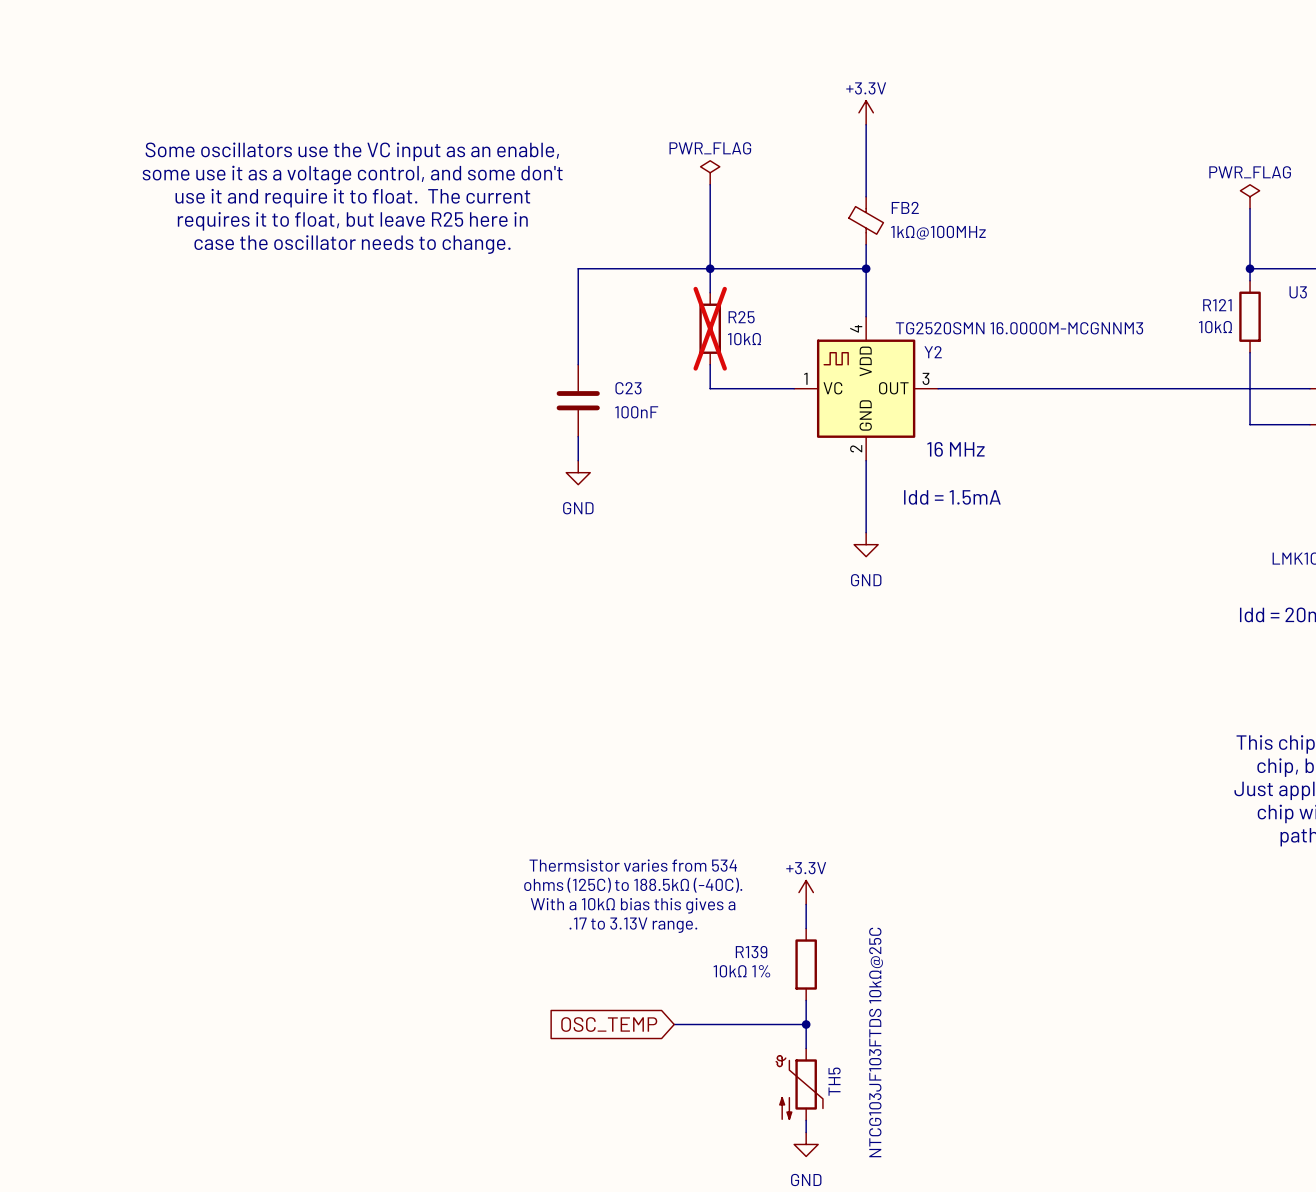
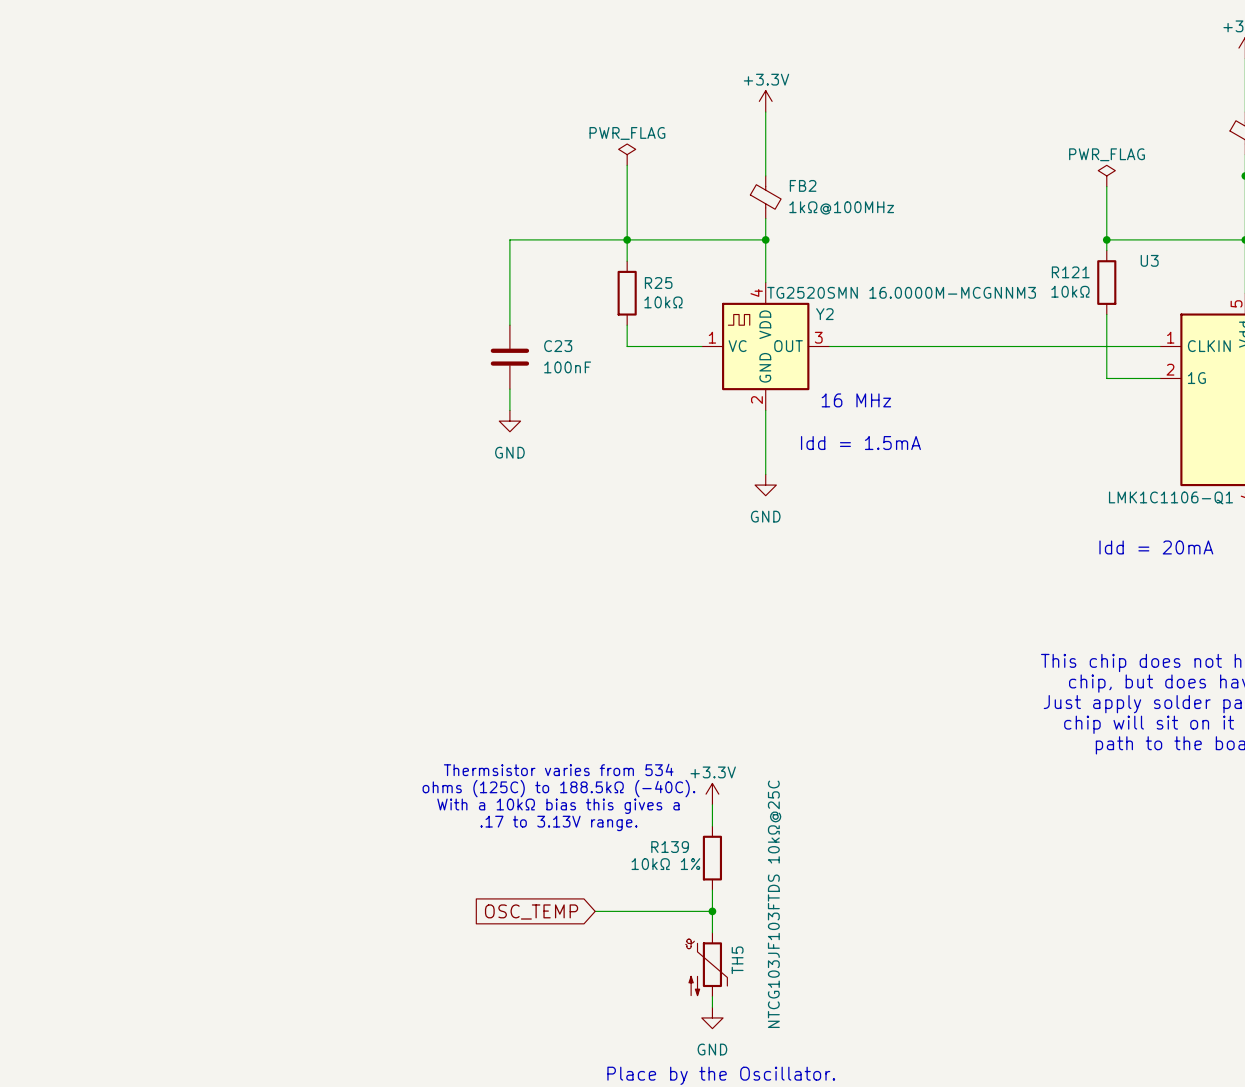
text: Some oscillators use the VC input as an enable, (352, 151) -> none
text: some use it as a voltage control, and some don't (352, 175) -> none
text: use it and require it to float. The current (352, 198) -> none
text: requires it to float, but leave R25 here in (352, 221) -> none
text: case the oscillator needs to change. (352, 244) -> none
R25 do-not-place cross: (710, 328) -> none

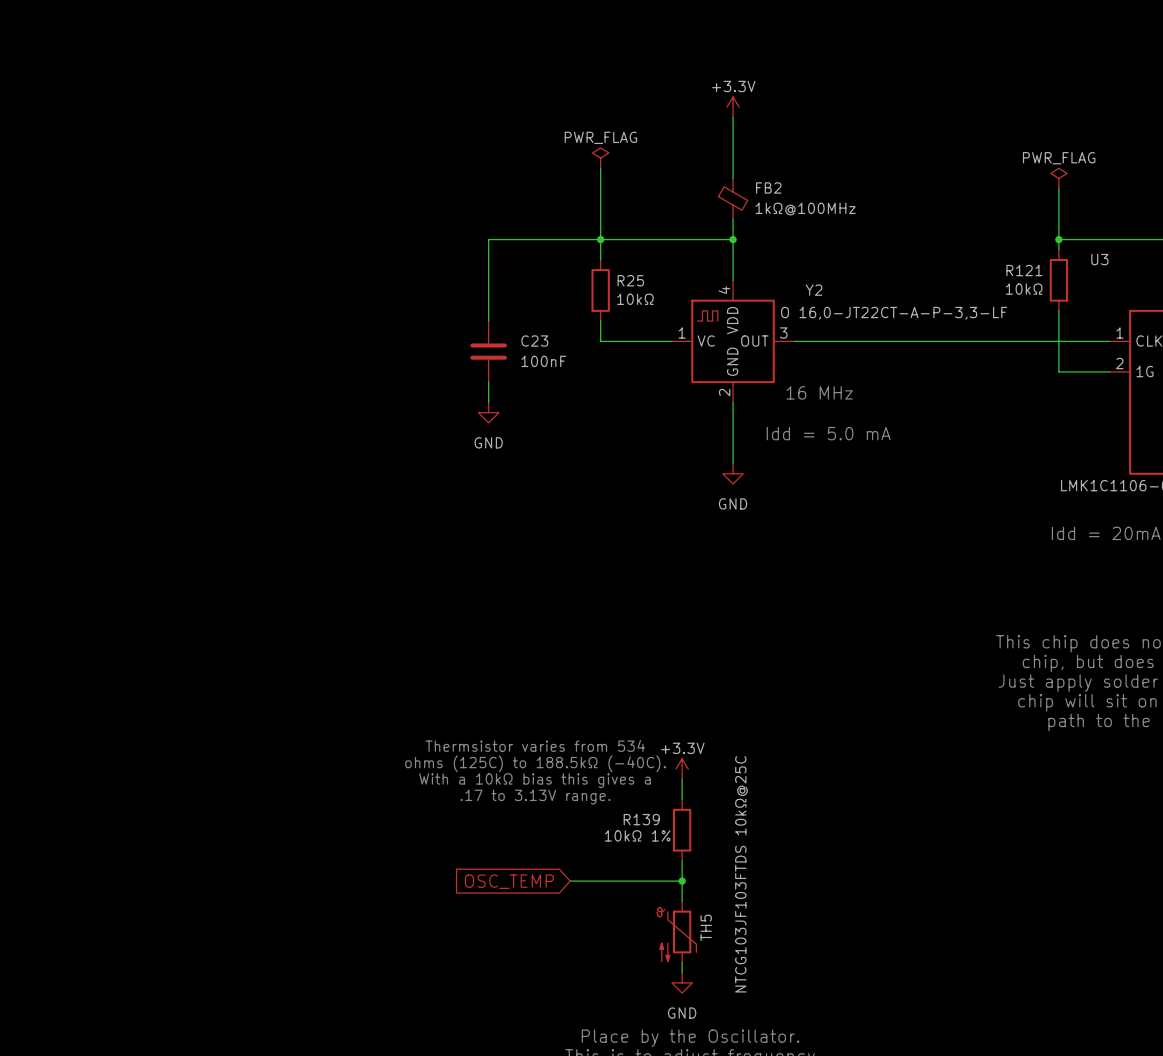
Y2 value: TG2520SMN 16.0000M-MCGNNM3 (901, 292) -> O 16,0-JT22CT-A-P-3,3-LF (894, 313)
Y2 name position: Y2 (824, 314) -> Y2 (814, 290)
text: Idd = 1.5mA (860, 443) -> Idd = 5.0 mA (828, 433)

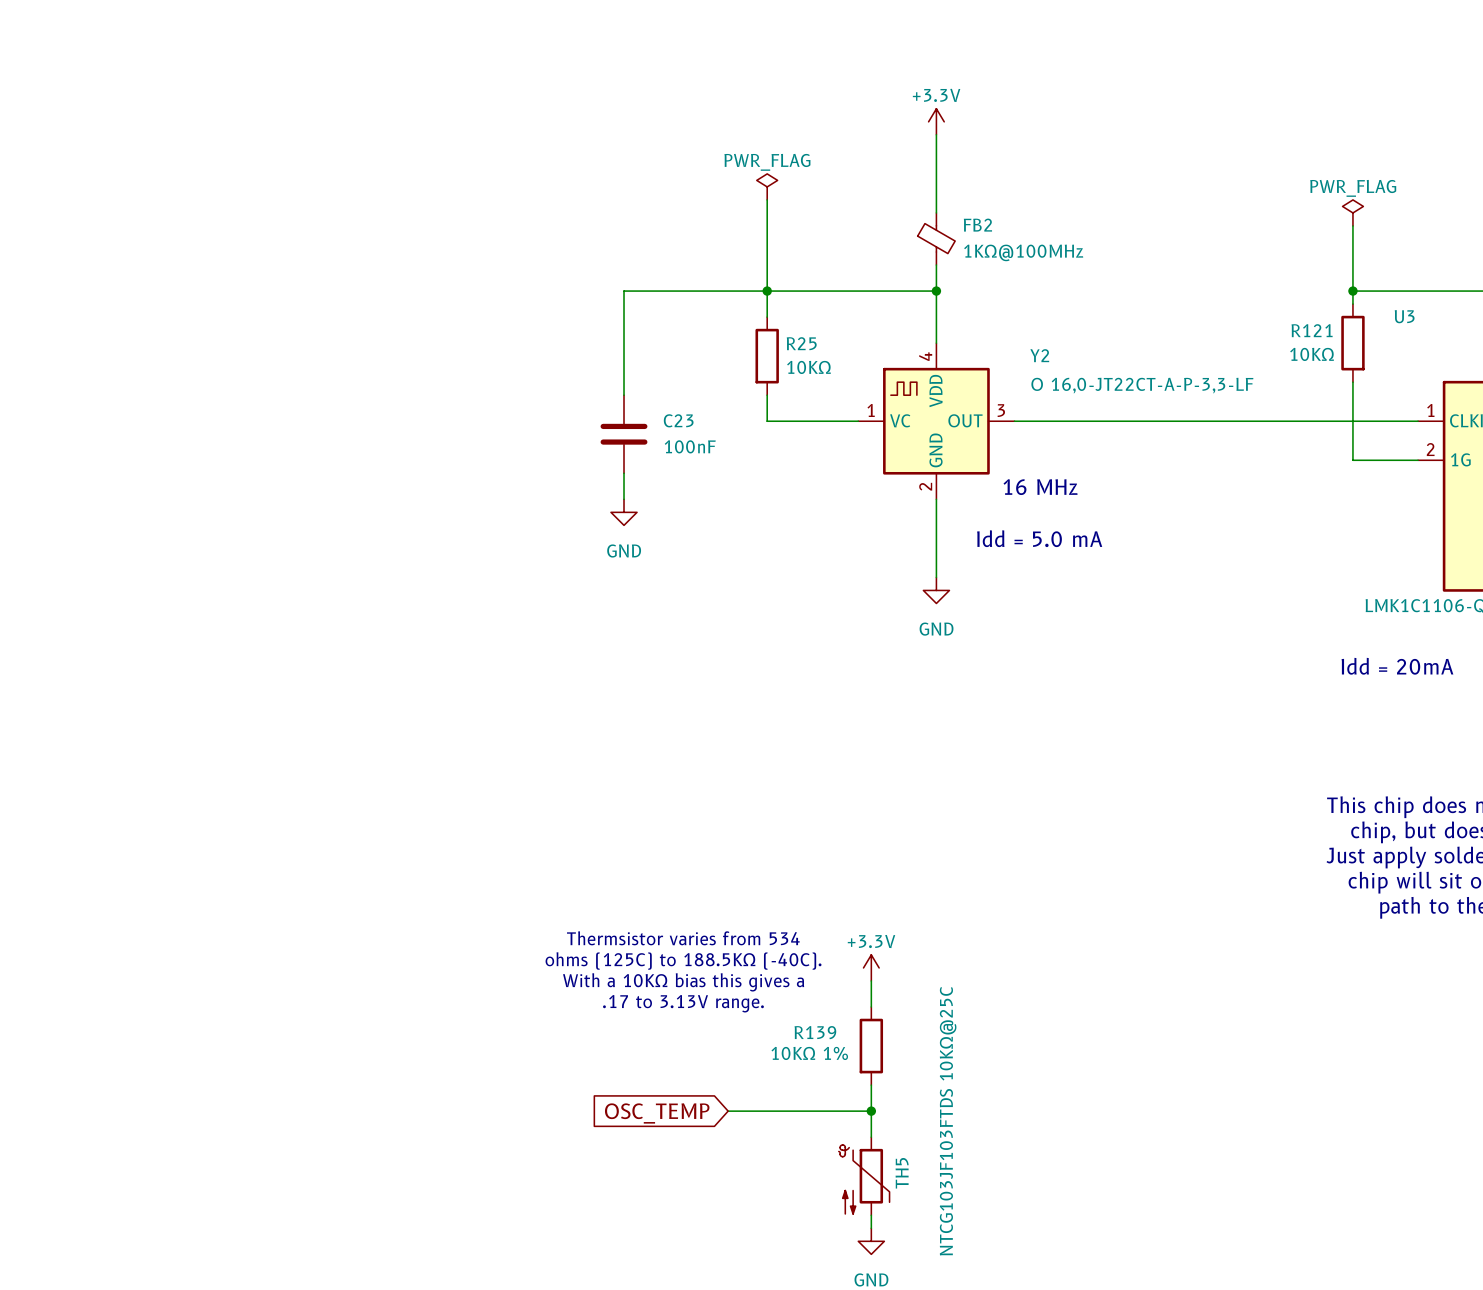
FB2 value: 1kΩ@100MHz (805, 209) -> 1KΩ@100MHz (1023, 252)
R121 value: 10kΩ (1024, 289) -> 10KΩ (1312, 354)
R25 value: 10kΩ (635, 299) -> 10KΩ (808, 367)
text: ohms (125C) to 188.5kΩ (-40C). (535, 763) -> ohms (125C) to 188.5KΩ (-40C). (683, 961)
text: With a 10kΩ bias this gives a (535, 780) -> With a 10KΩ bias this gives a (683, 982)
R139 value: 10kΩ 1% (637, 835) -> 10KΩ 1% (809, 1053)
TH5 value: NTCG103JF103FTDS 10kΩ@25C (741, 874) -> NTCG103JF103FTDS 10KΩ@25C (948, 1121)

